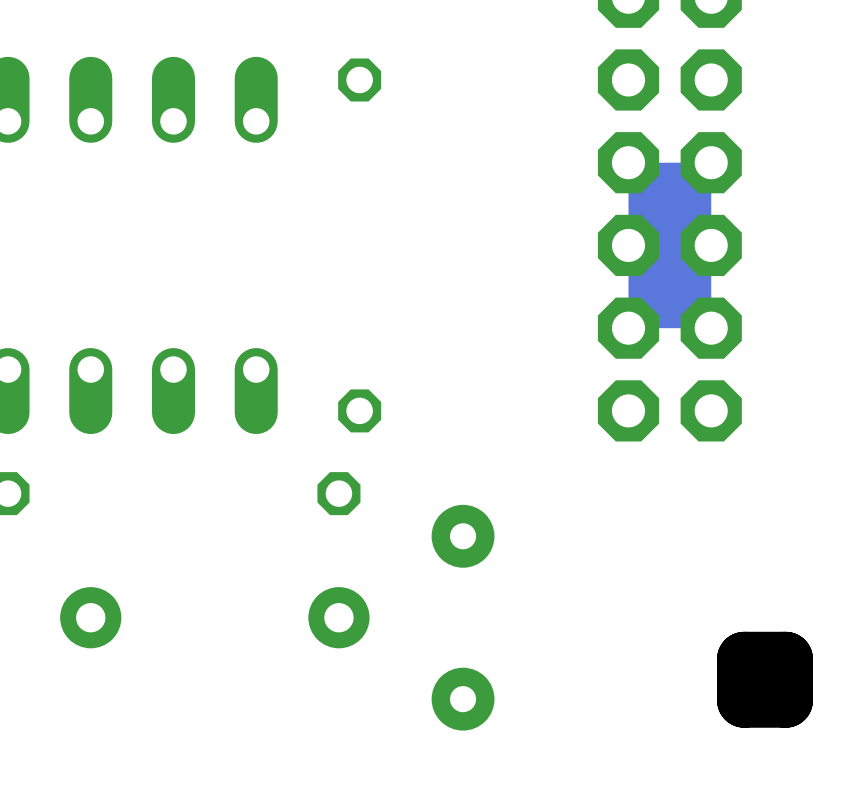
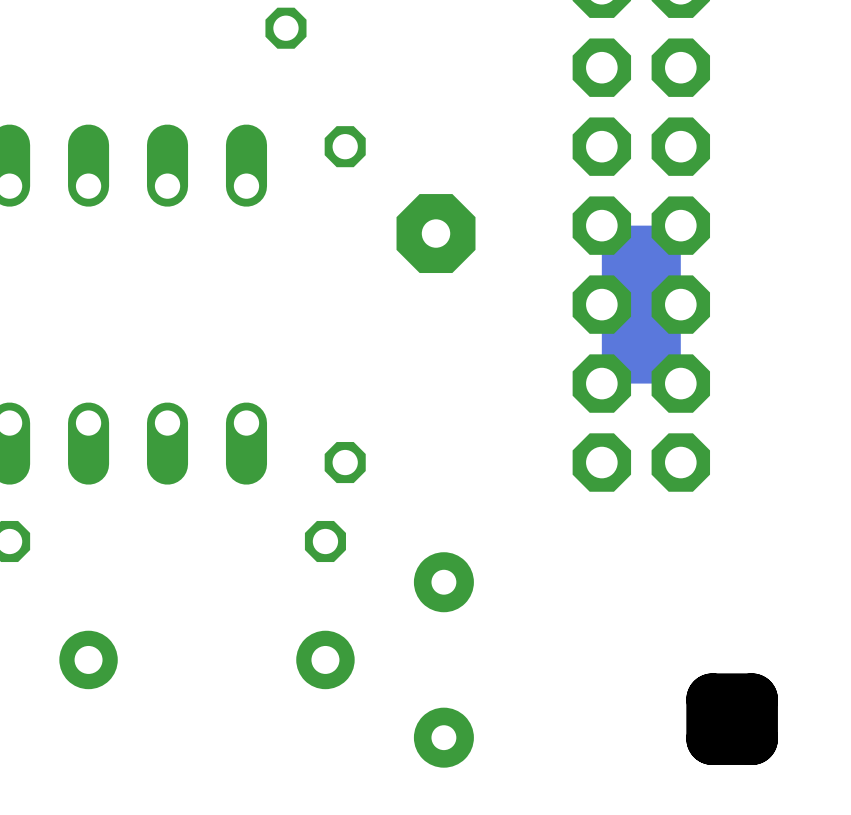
part: none -> (436, 233)

